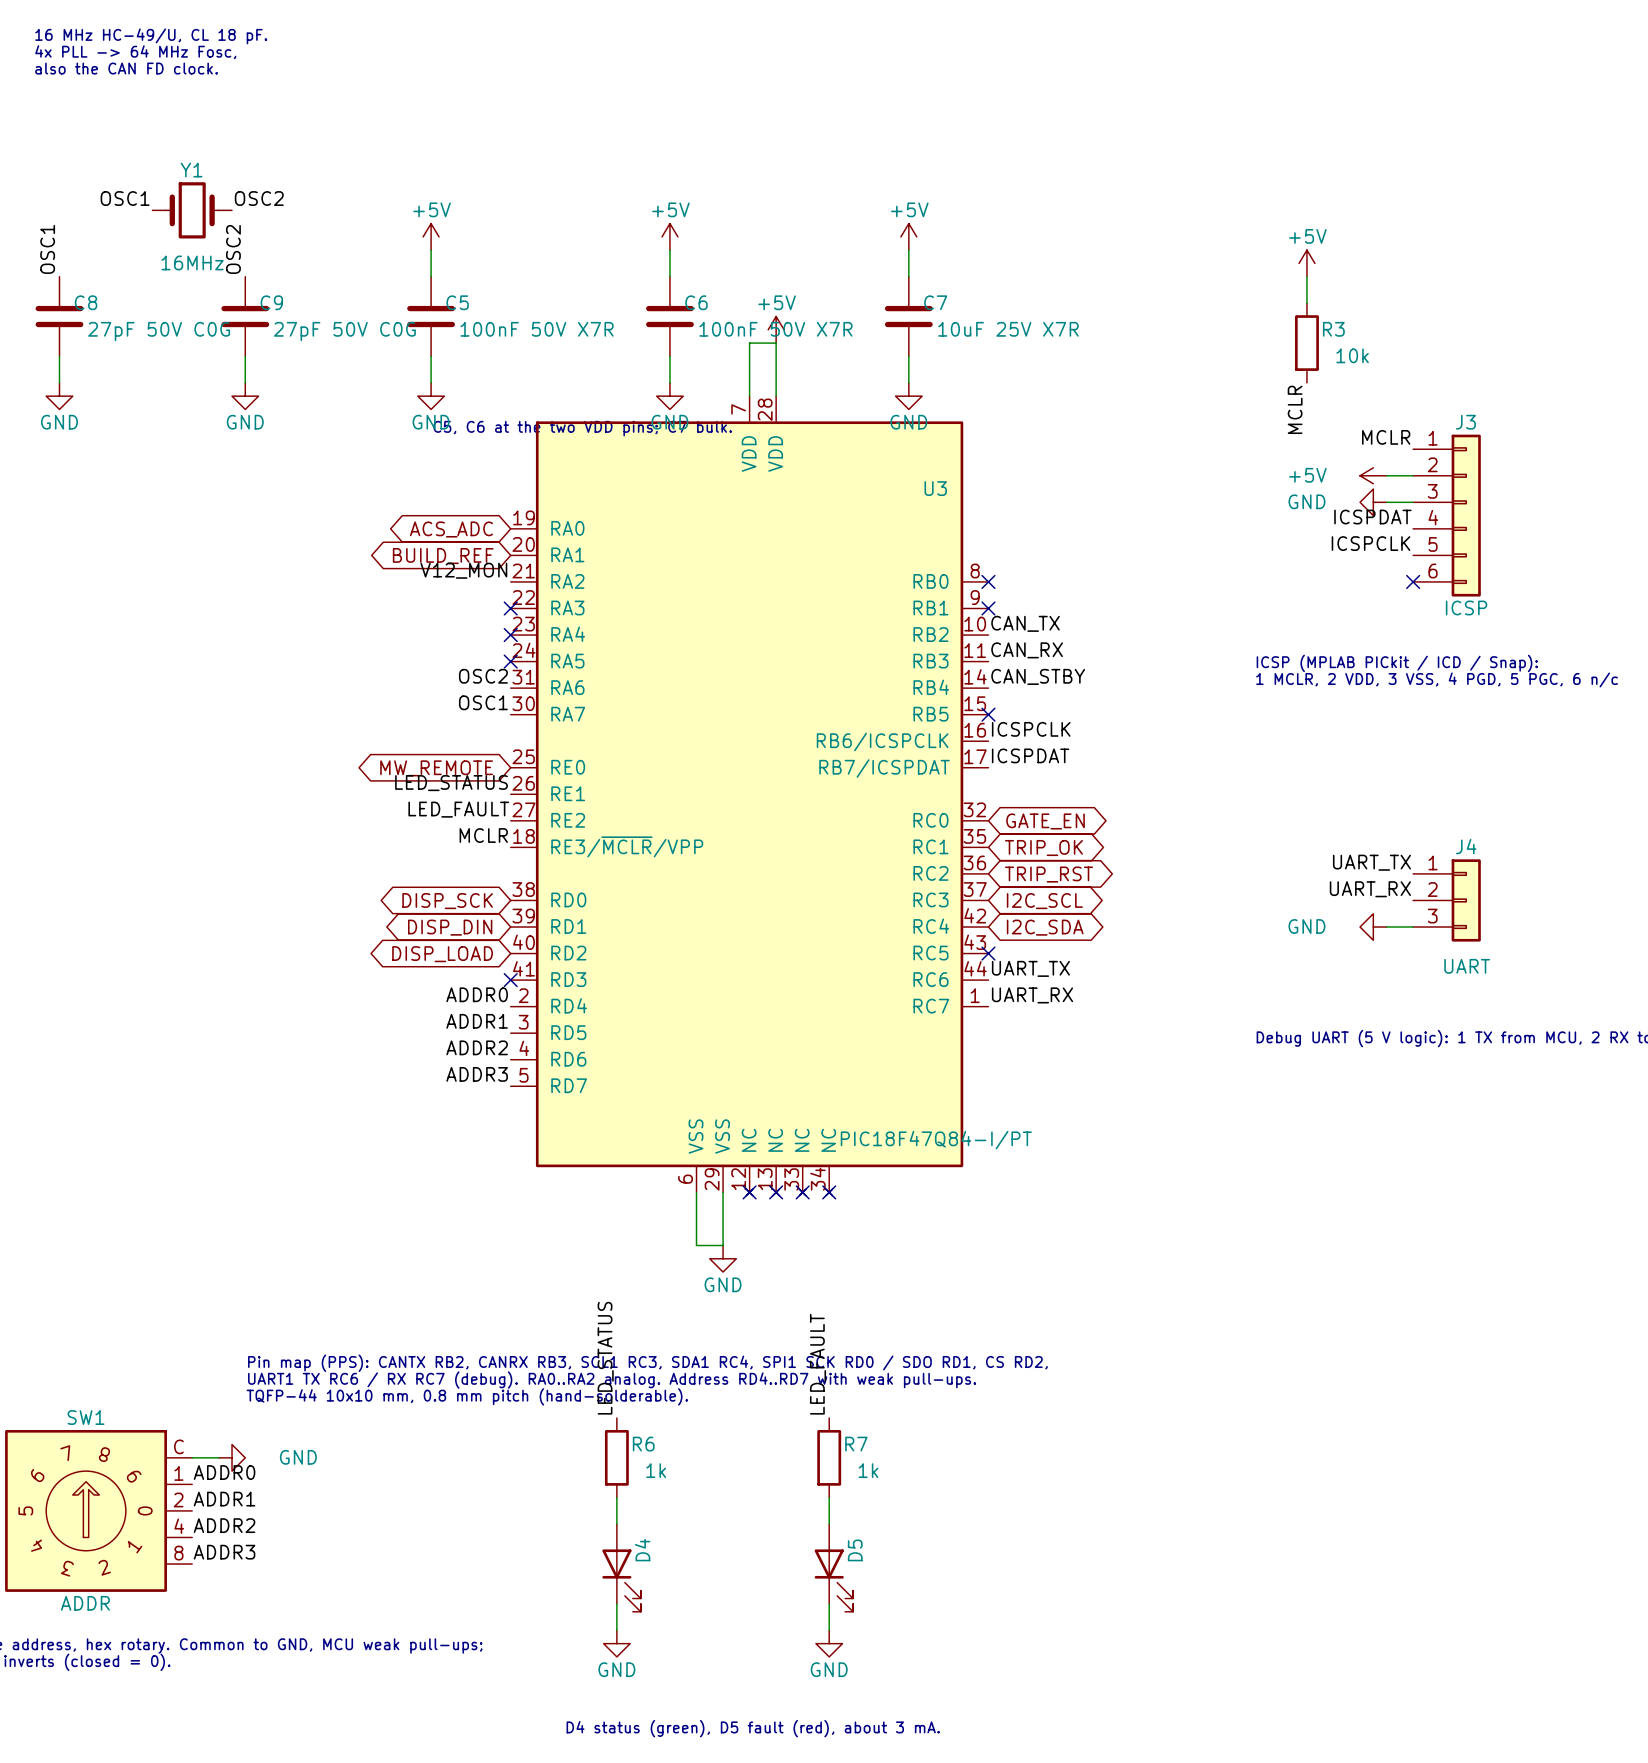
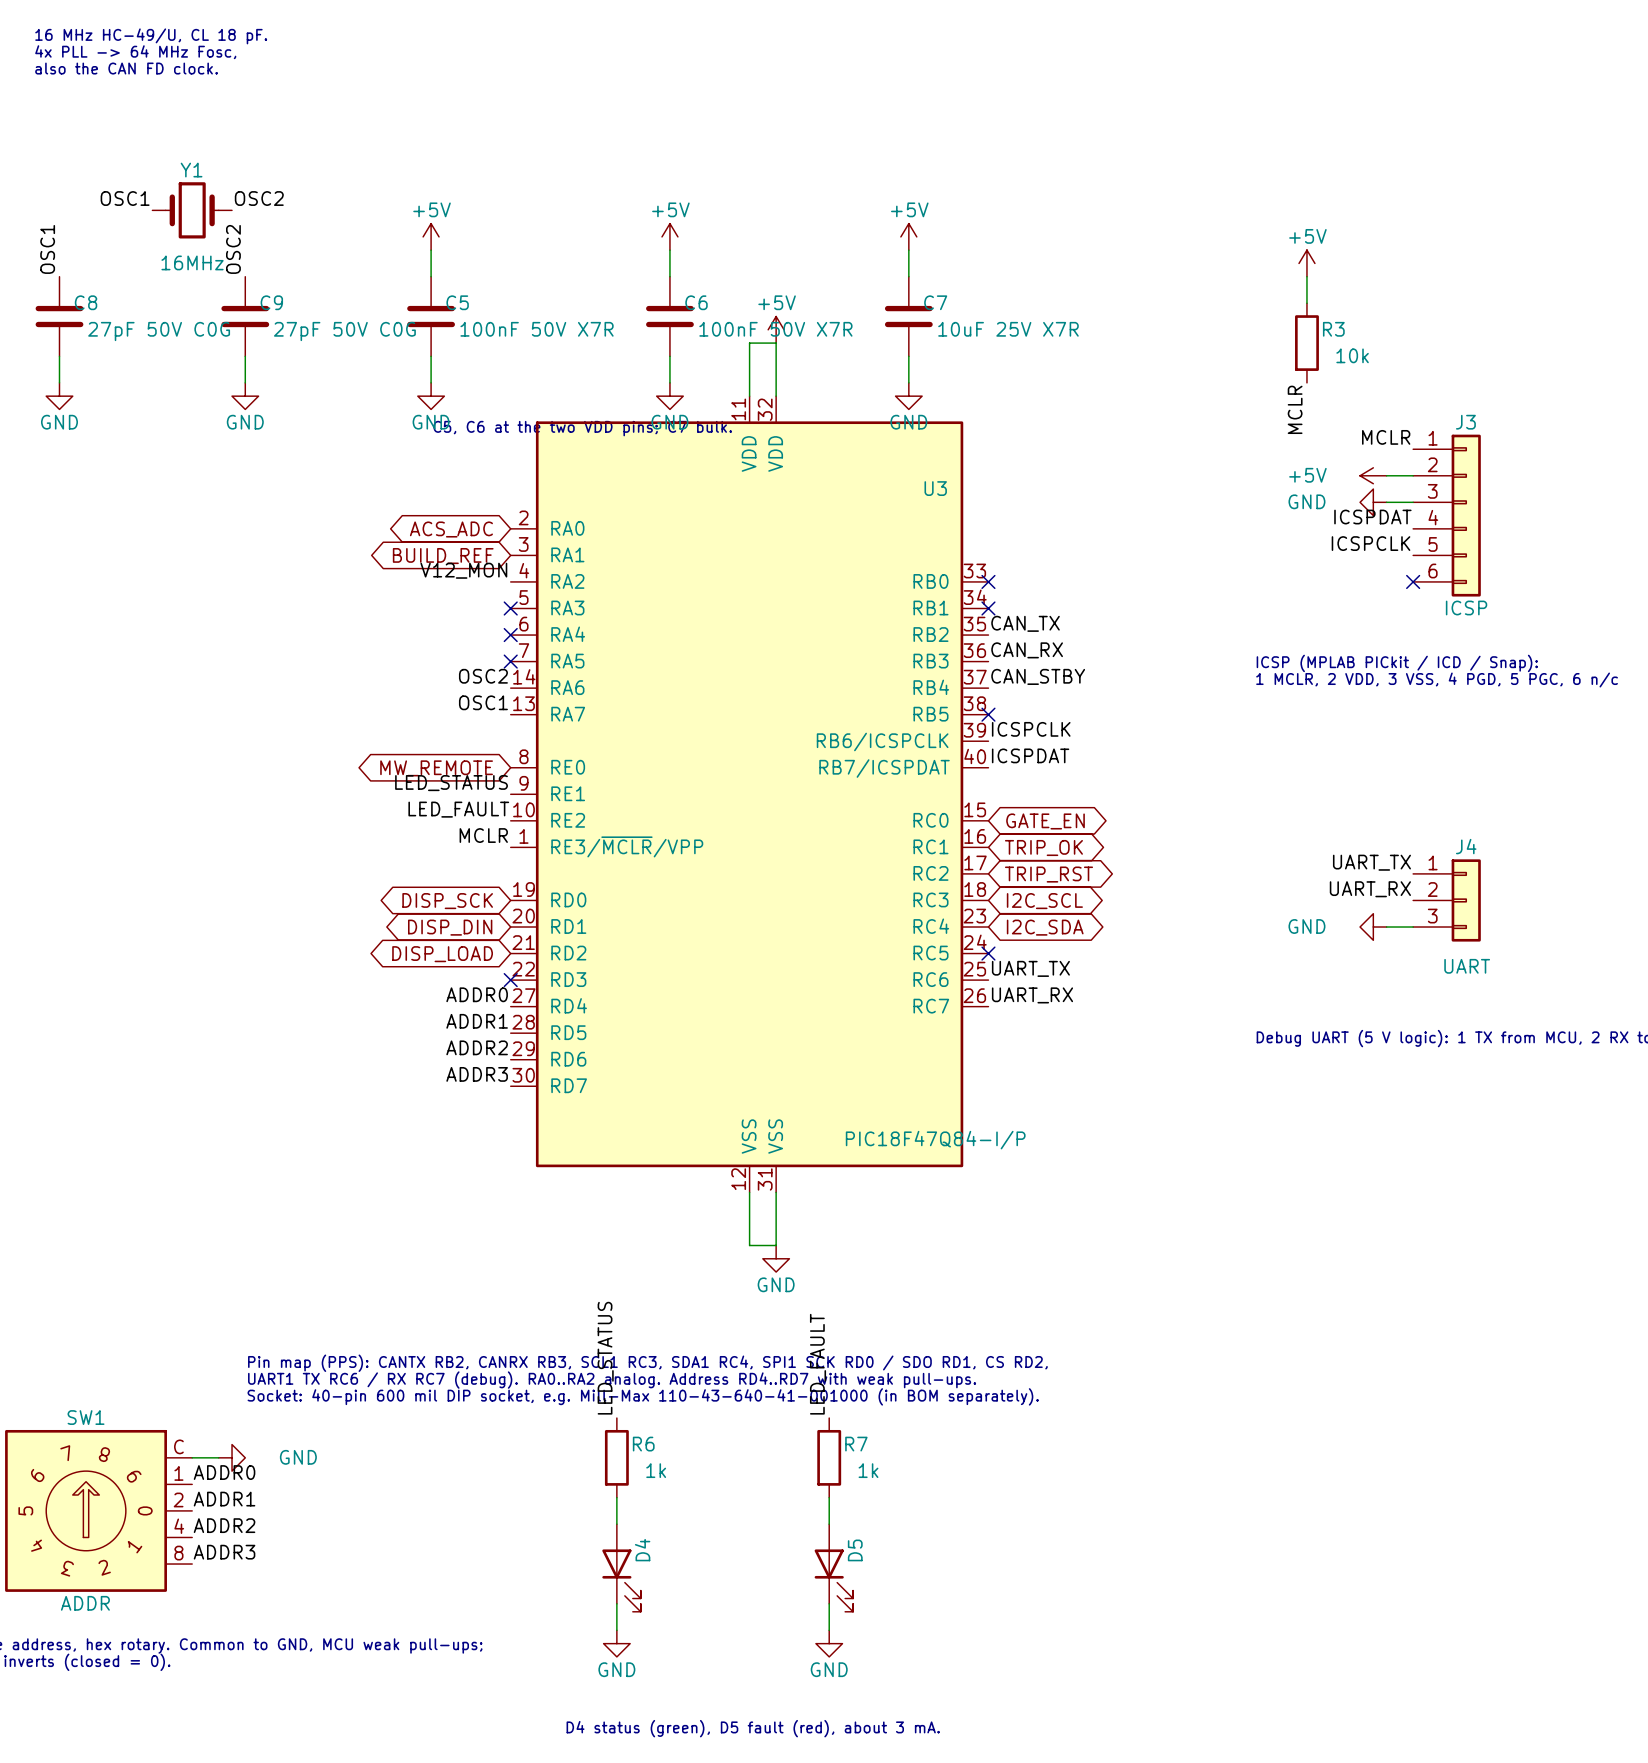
U3 symbol: [510, 396, 989, 1196] -> [510, 396, 989, 1193]
U3 value: PIC18F47Q84-I/PT (936, 1140) -> PIC18F47Q84-I/P (935, 1140)
wire: (696, 1192) (696, 1245) (723, 1245) (723, 1192) -> (749, 1192) (749, 1245) (776, 1245) (776, 1192)
no-connect mark: (749, 1192) -> none
no-connect mark: (776, 1192) -> none
no-connect mark: (802, 1192) -> none
no-connect mark: (829, 1192) -> none
power symbol position: GND (723, 1258) -> GND (776, 1258)
text: TQFP-44 10x10 mm, 0.8 mm pitch (hand-solderable). (467, 1396) -> Socket: 40-pin 600 mil DIP socket, e.g. Mill-Max 110-43-640-41-001000 (in BOM separately). (643, 1396)

